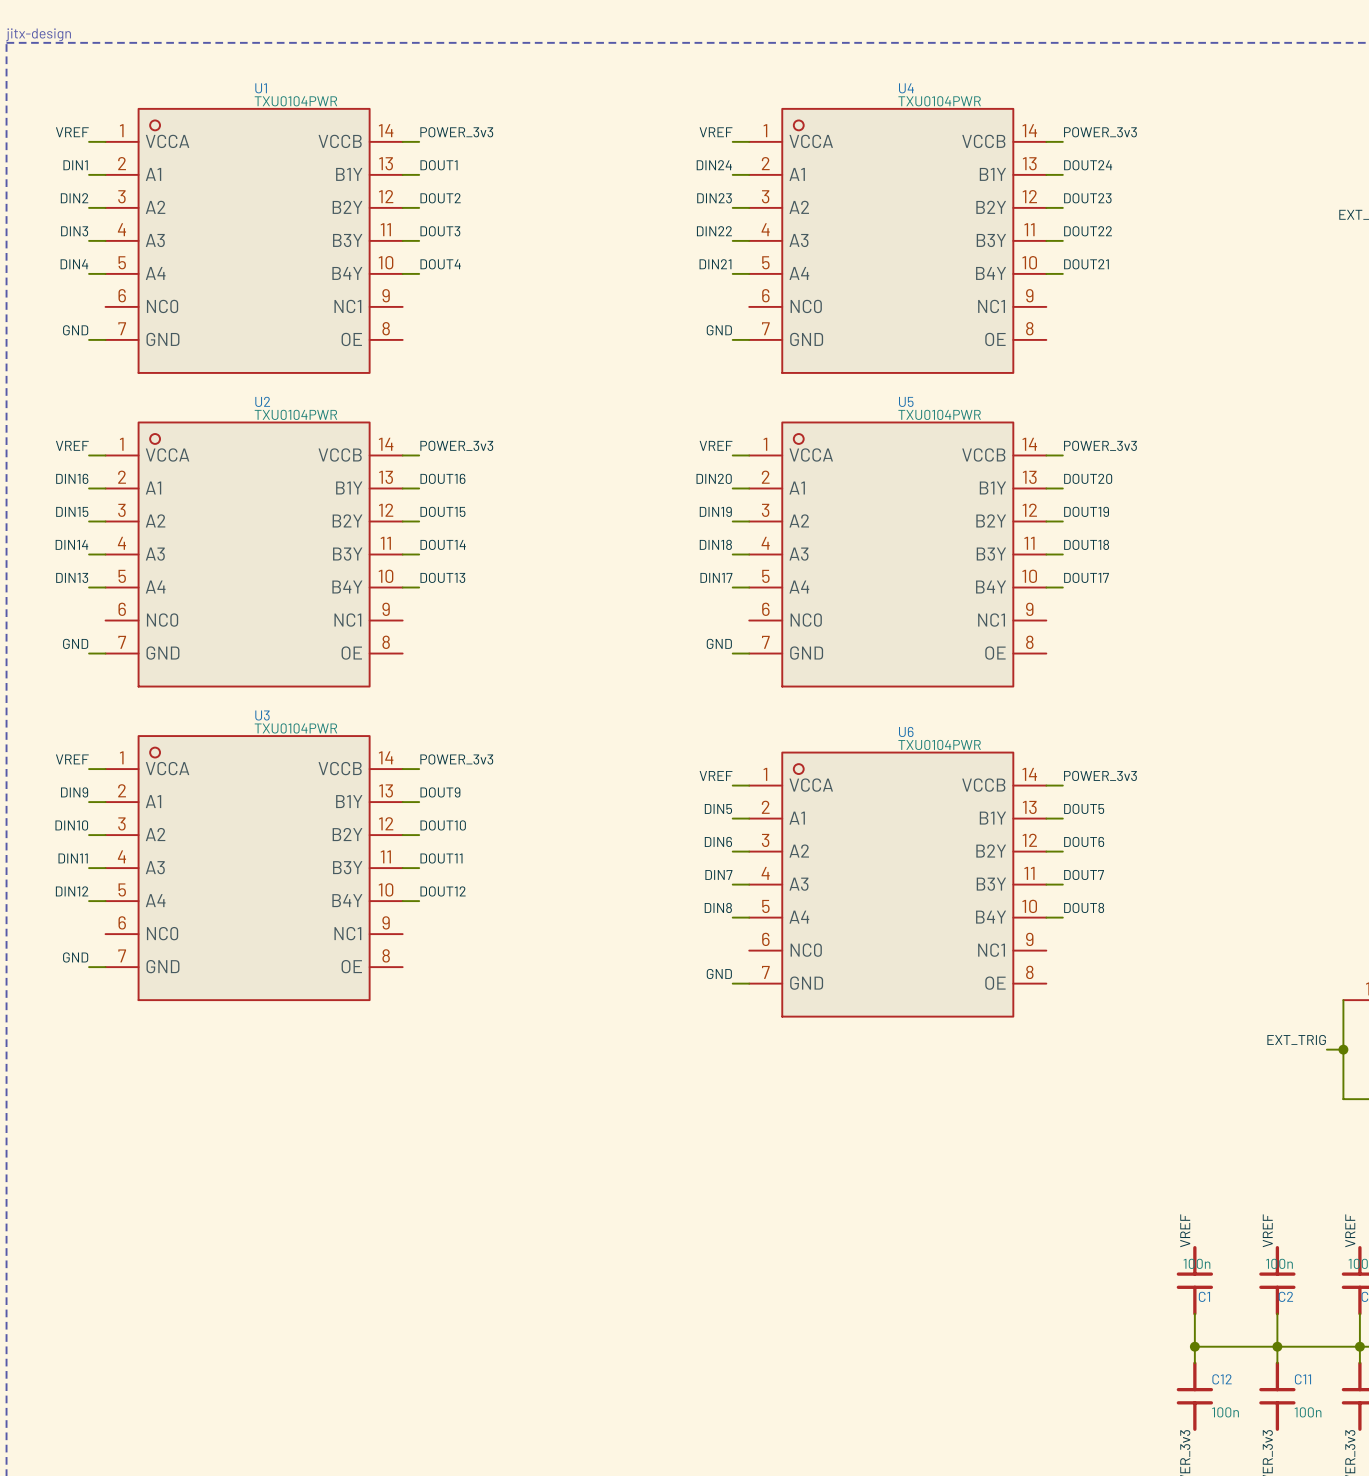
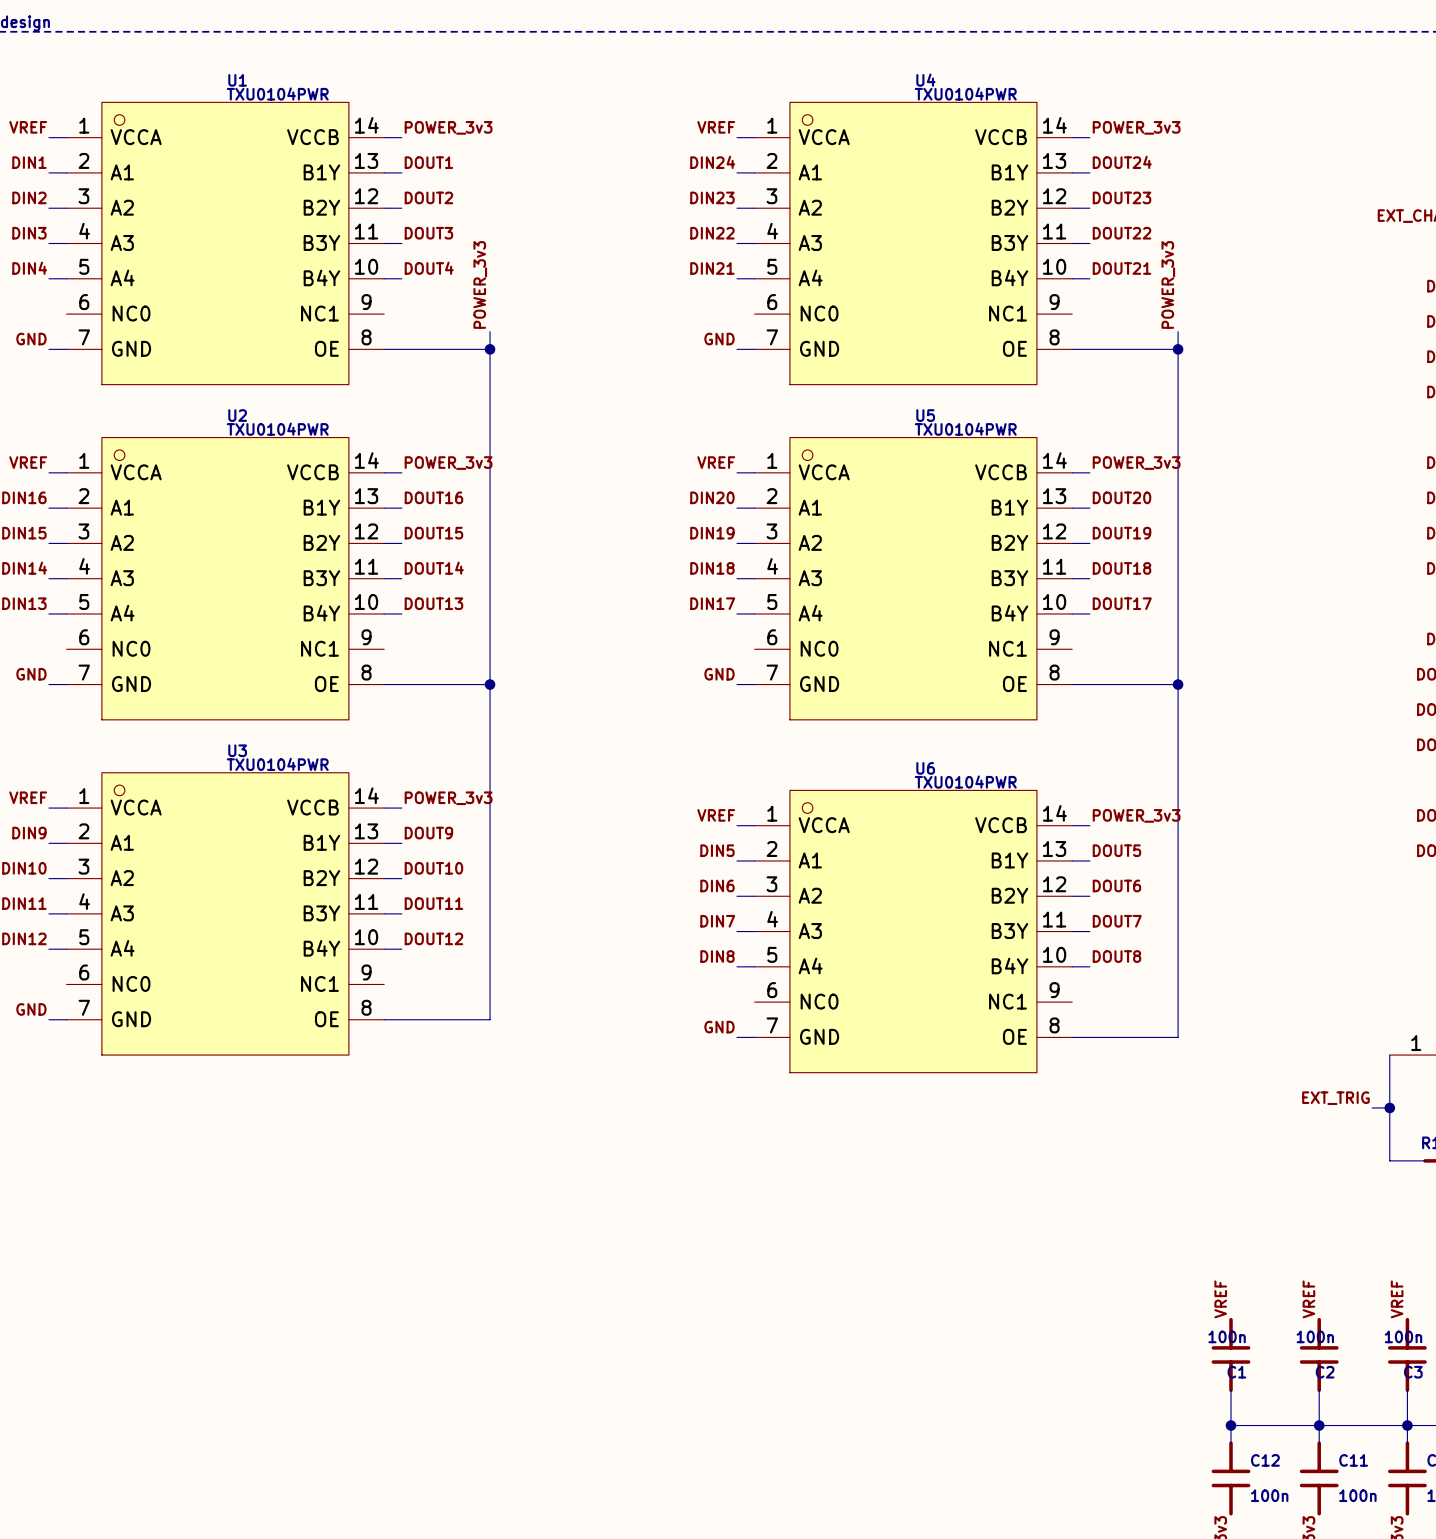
label: none -> POWER_3v3 (480, 284)
label: none -> POWER_3v3 (1168, 284)
wire: none -> (490, 331) (490, 1019) (384, 1019)
wire: none -> (1178, 331) (1178, 1037) (1072, 1037)
wire: none -> (384, 349) (490, 349)
junction: none -> (490, 349)
wire: none -> (1072, 349) (1178, 349)
junction: none -> (1178, 349)
wire: none -> (384, 684) (490, 684)
junction: none -> (490, 684)
wire: none -> (1072, 684) (1178, 684)
junction: none -> (1178, 684)

